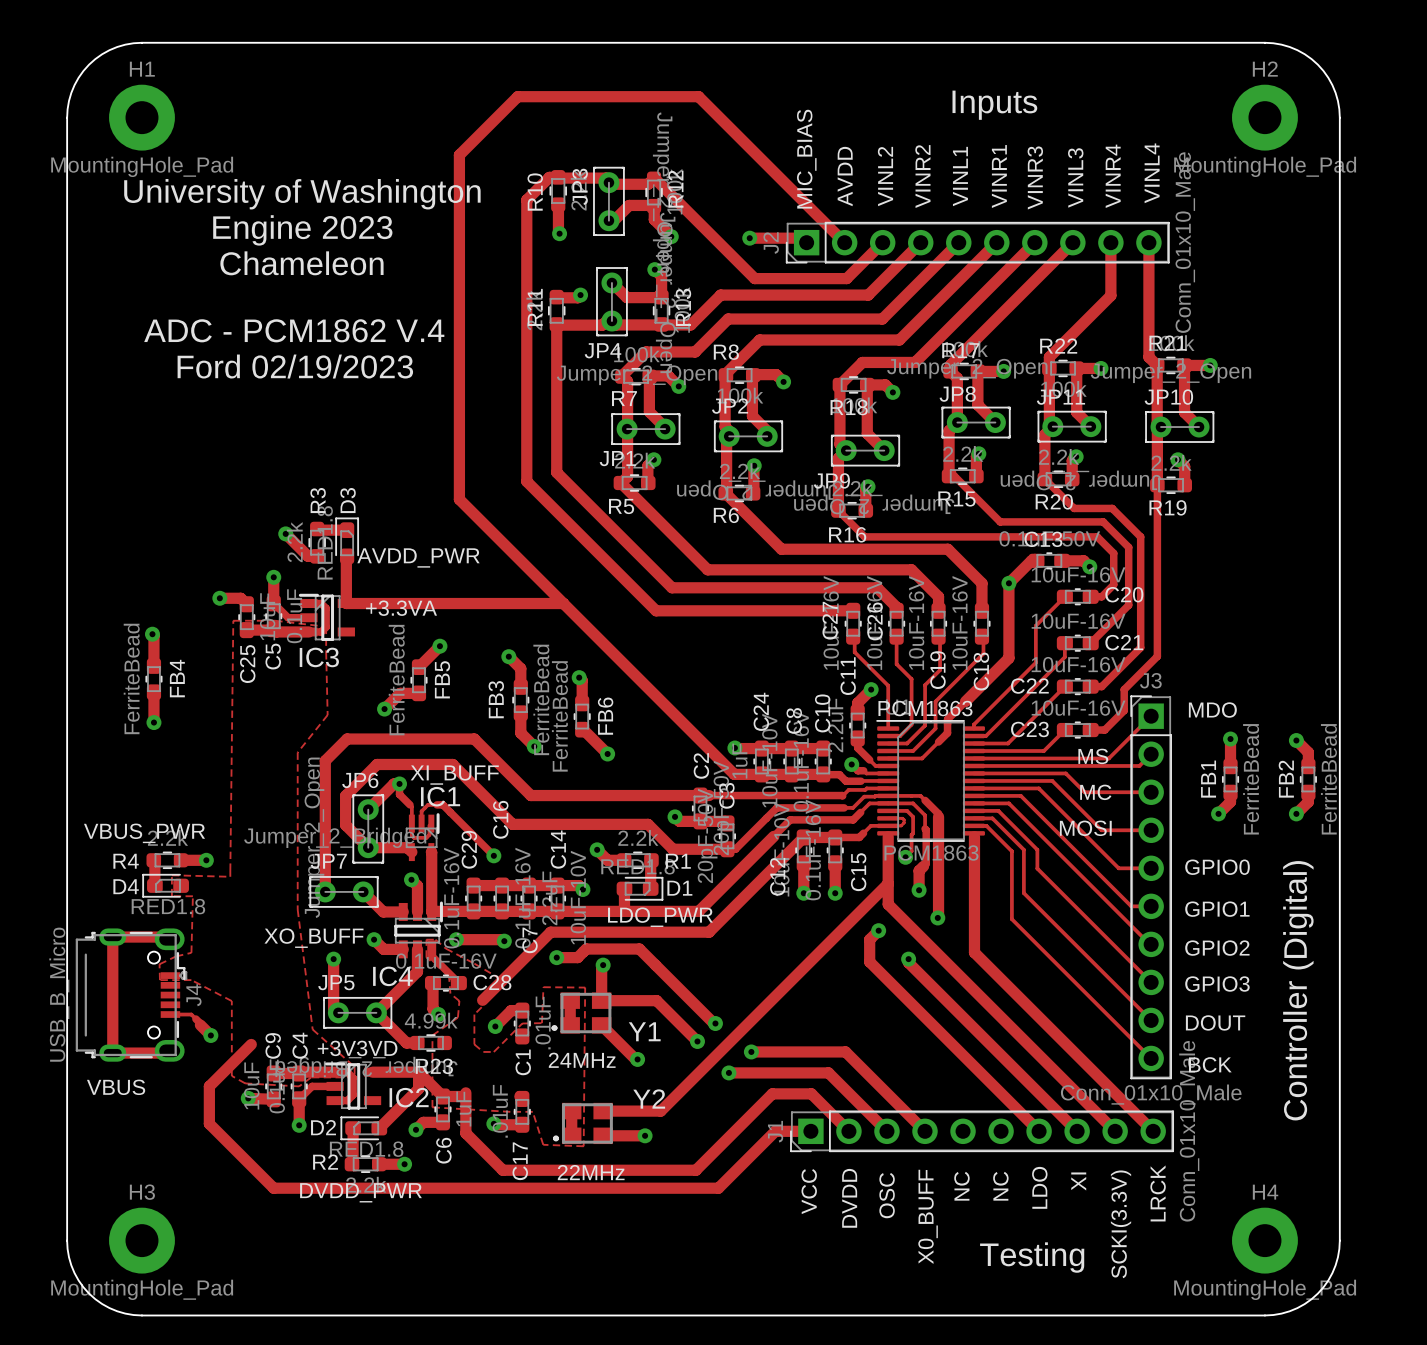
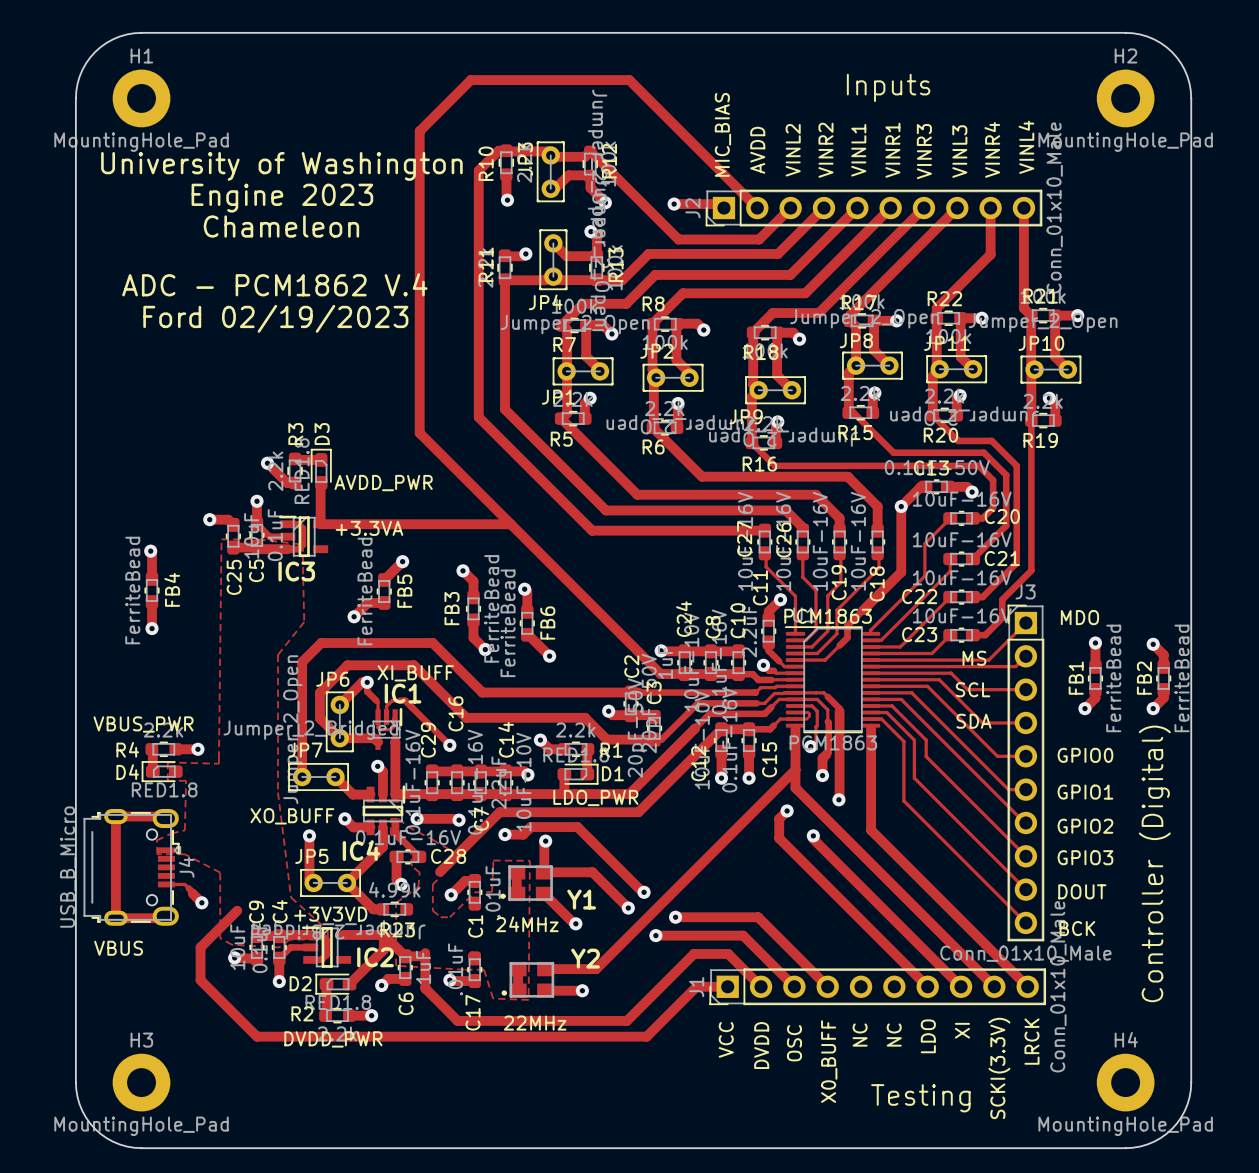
text: MC (1095, 792) -> SCL (973, 689)
text: MOSI (1085, 828) -> SDA (974, 721)

